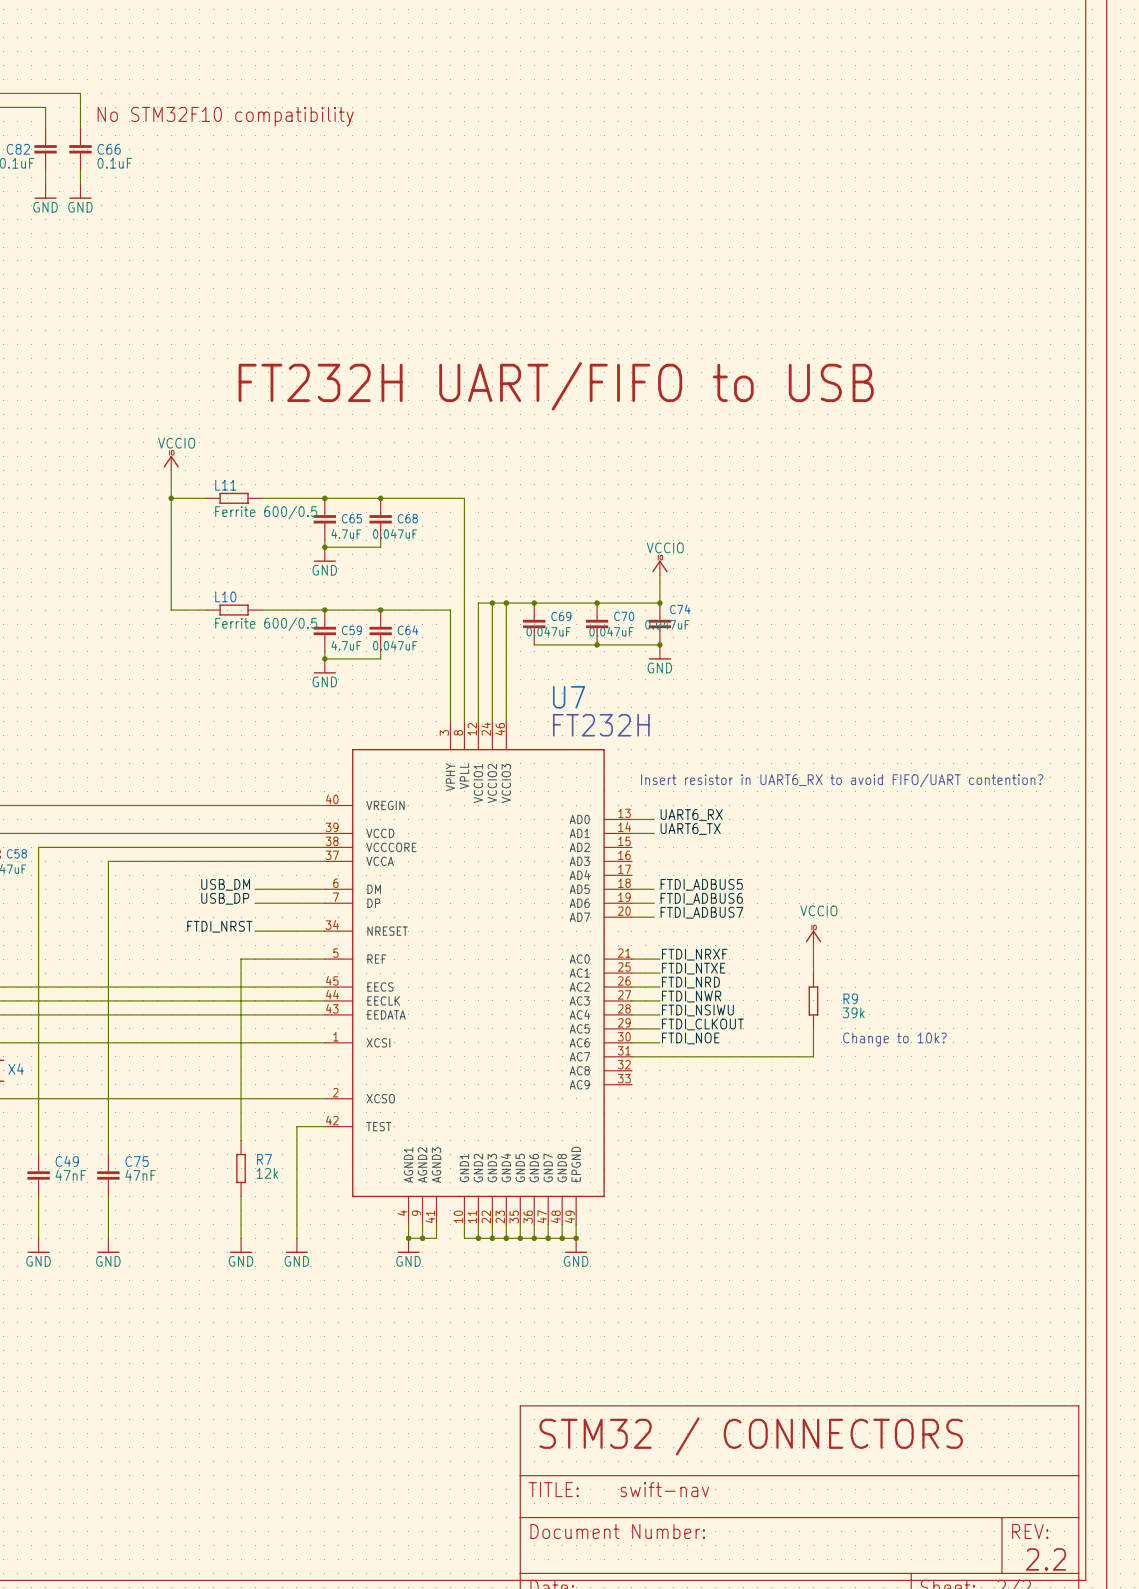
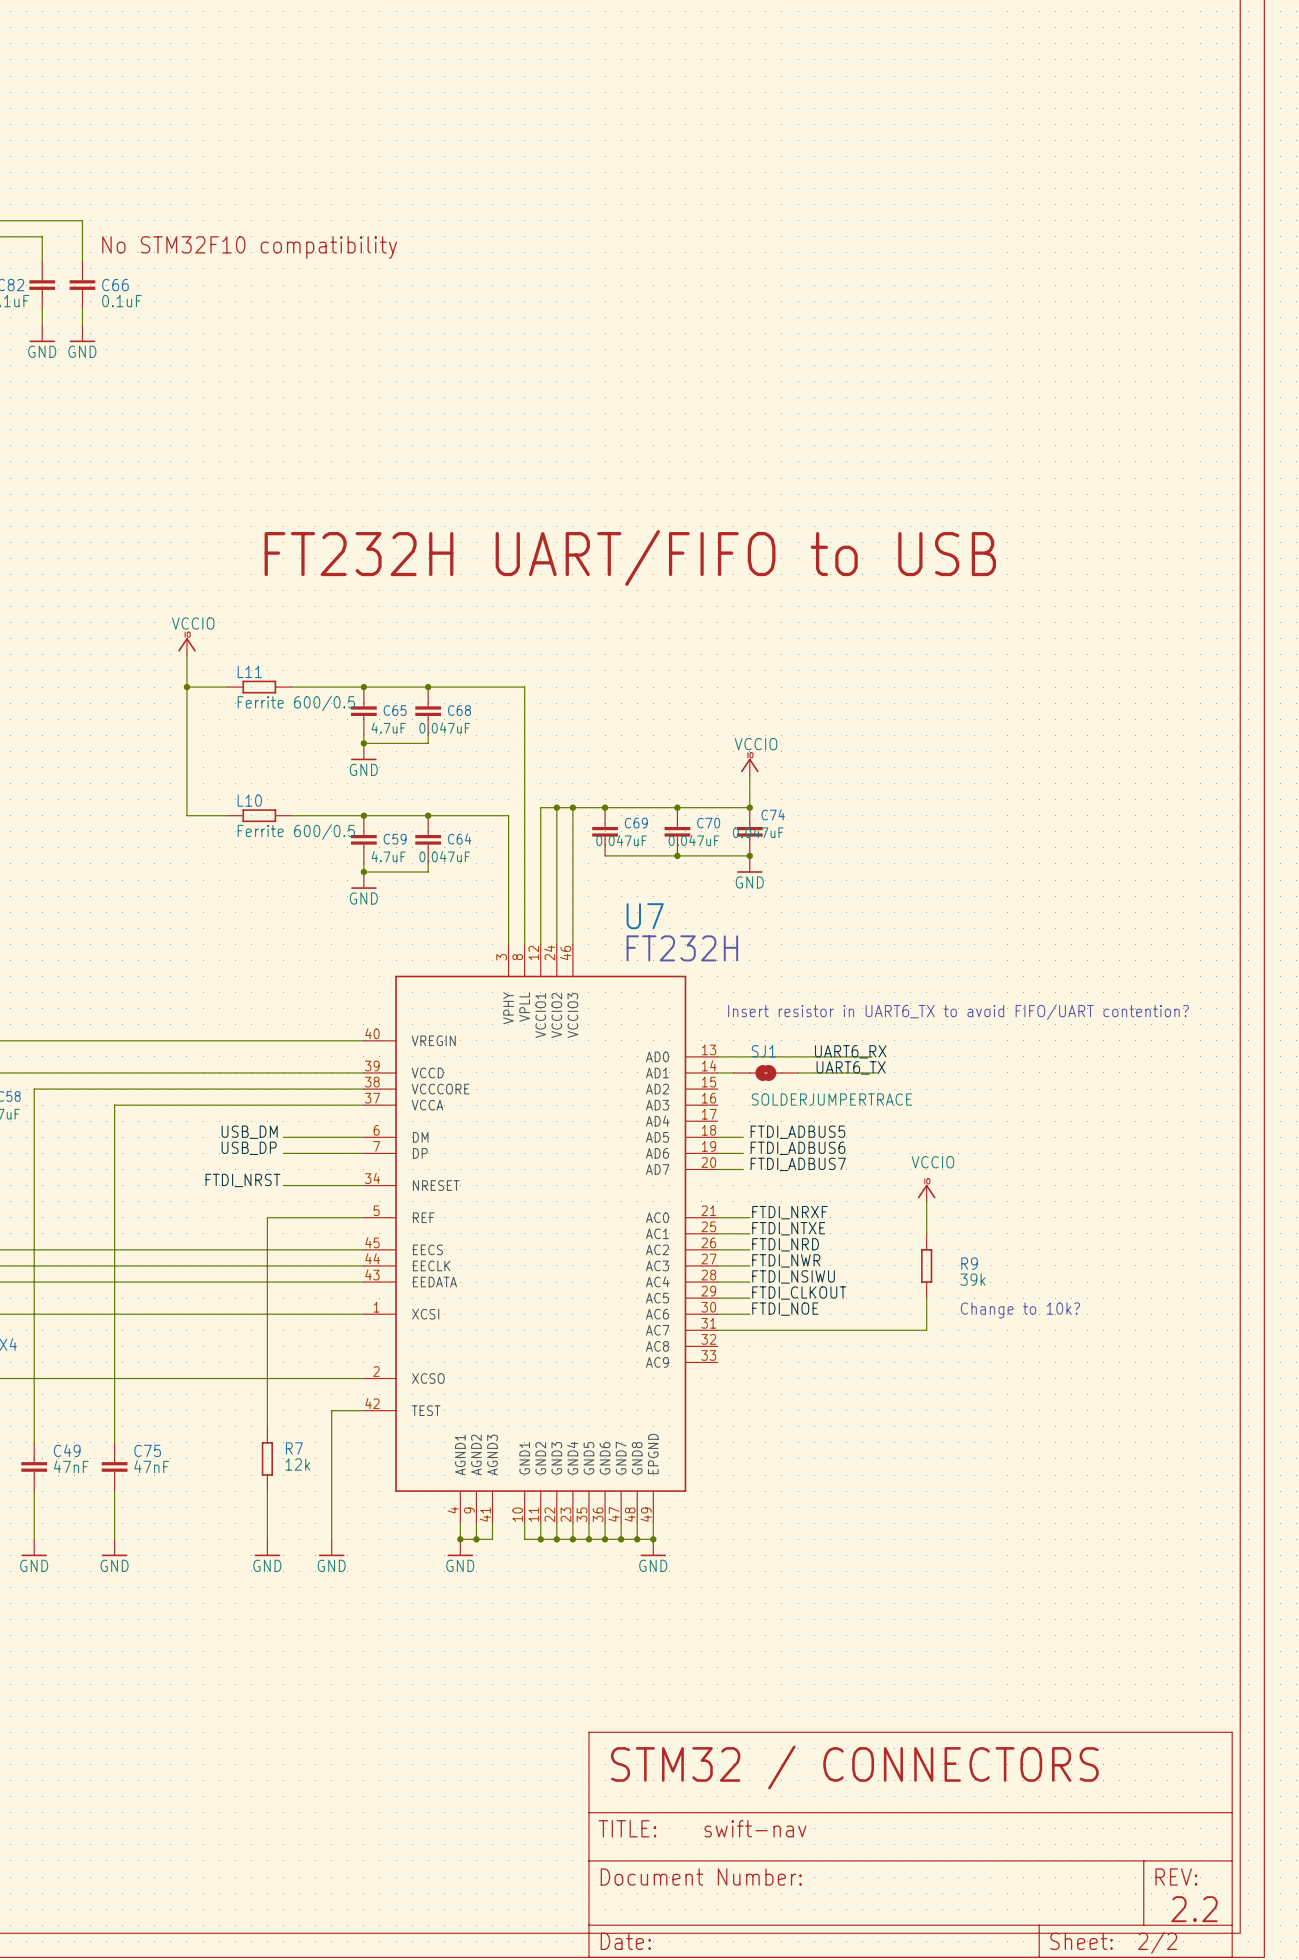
text: Insert resistor in UART6_RX to avoid FIFO/UART contention? (842, 780) -> Insert resistor in UART6_TX to avoid FIFO/UART contention? (958, 1012)
label position: UART6_RX (691, 815) -> UART6_RX (850, 1051)
wire: none -> (743, 1056) (872, 1056)
label position: UART6_TX (690, 829) -> UART6_TX (851, 1067)
SJ1: none -> SOLDERJUMPERTRACE (765, 1072)
wire: none -> (798, 1072) (878, 1072)

